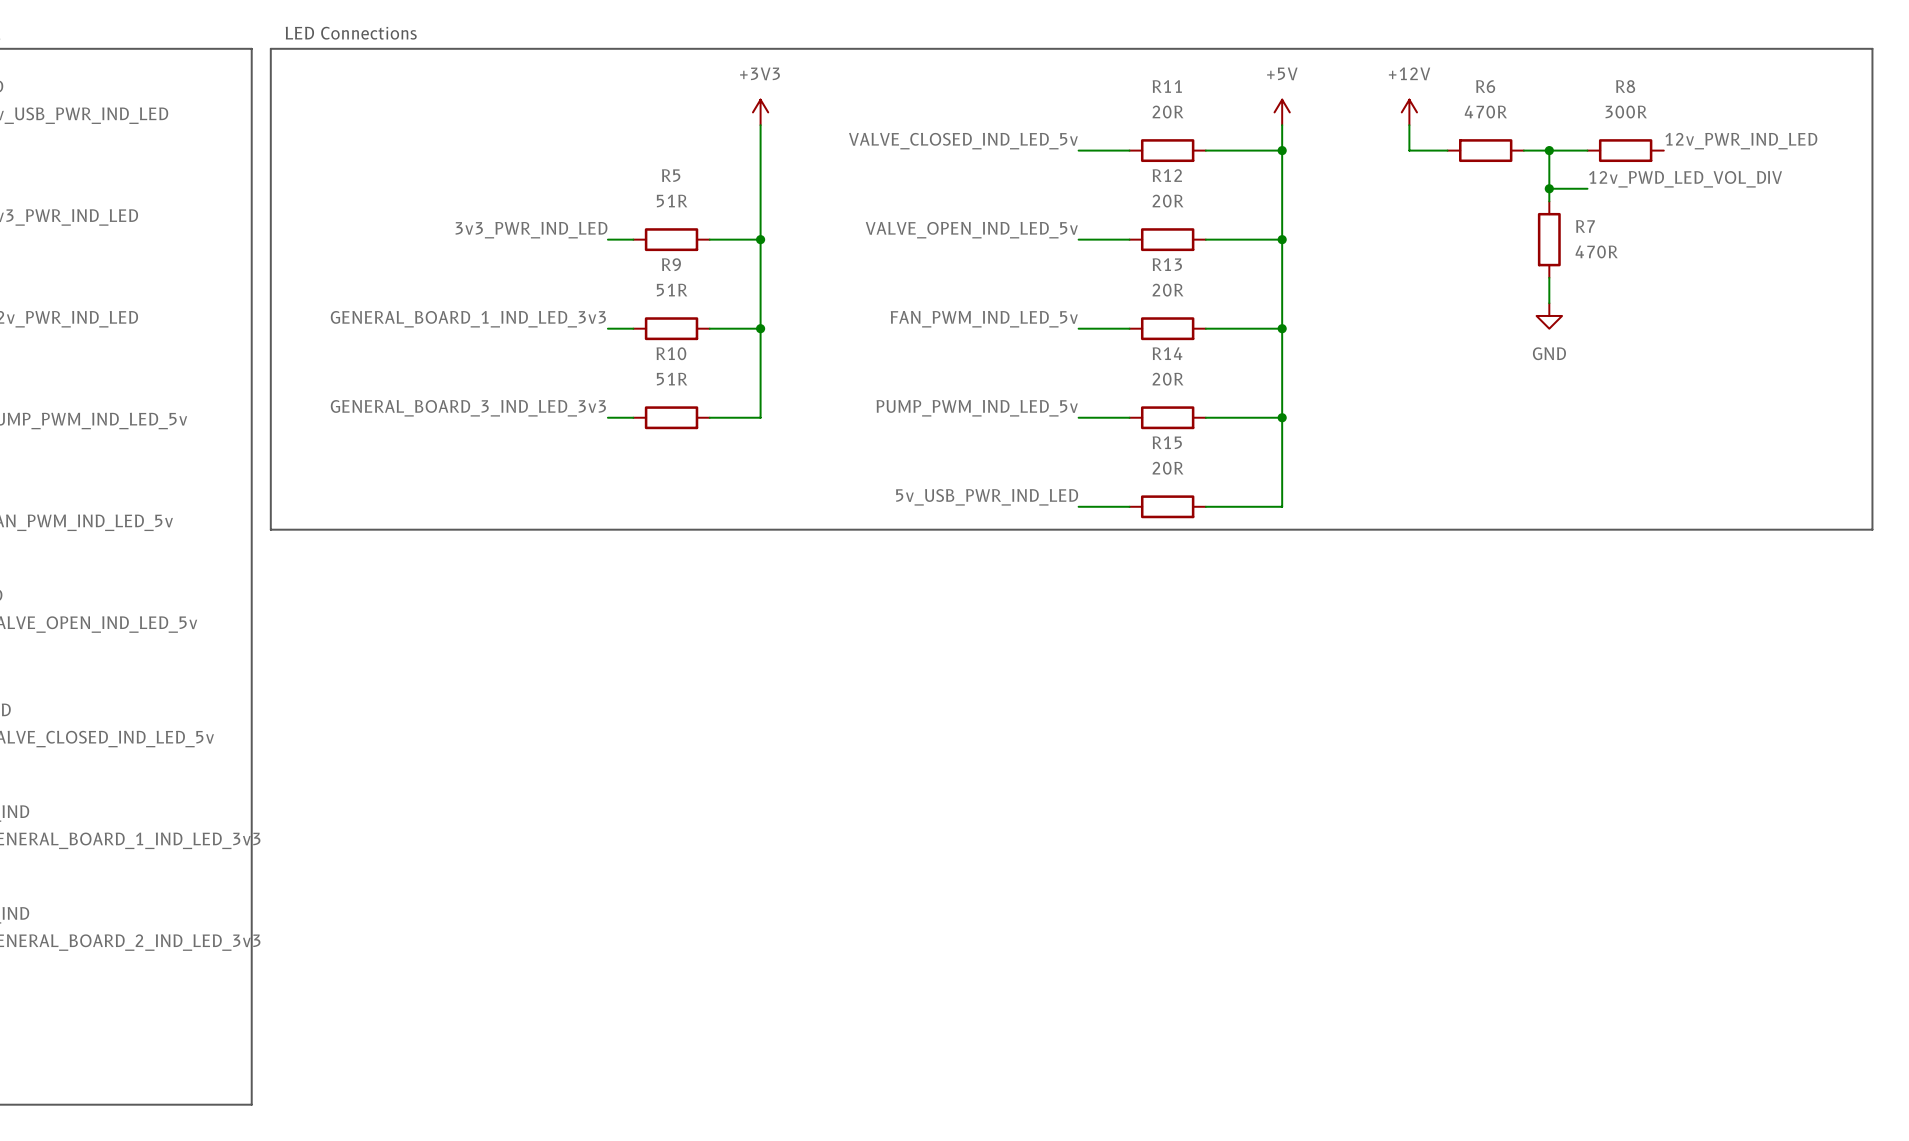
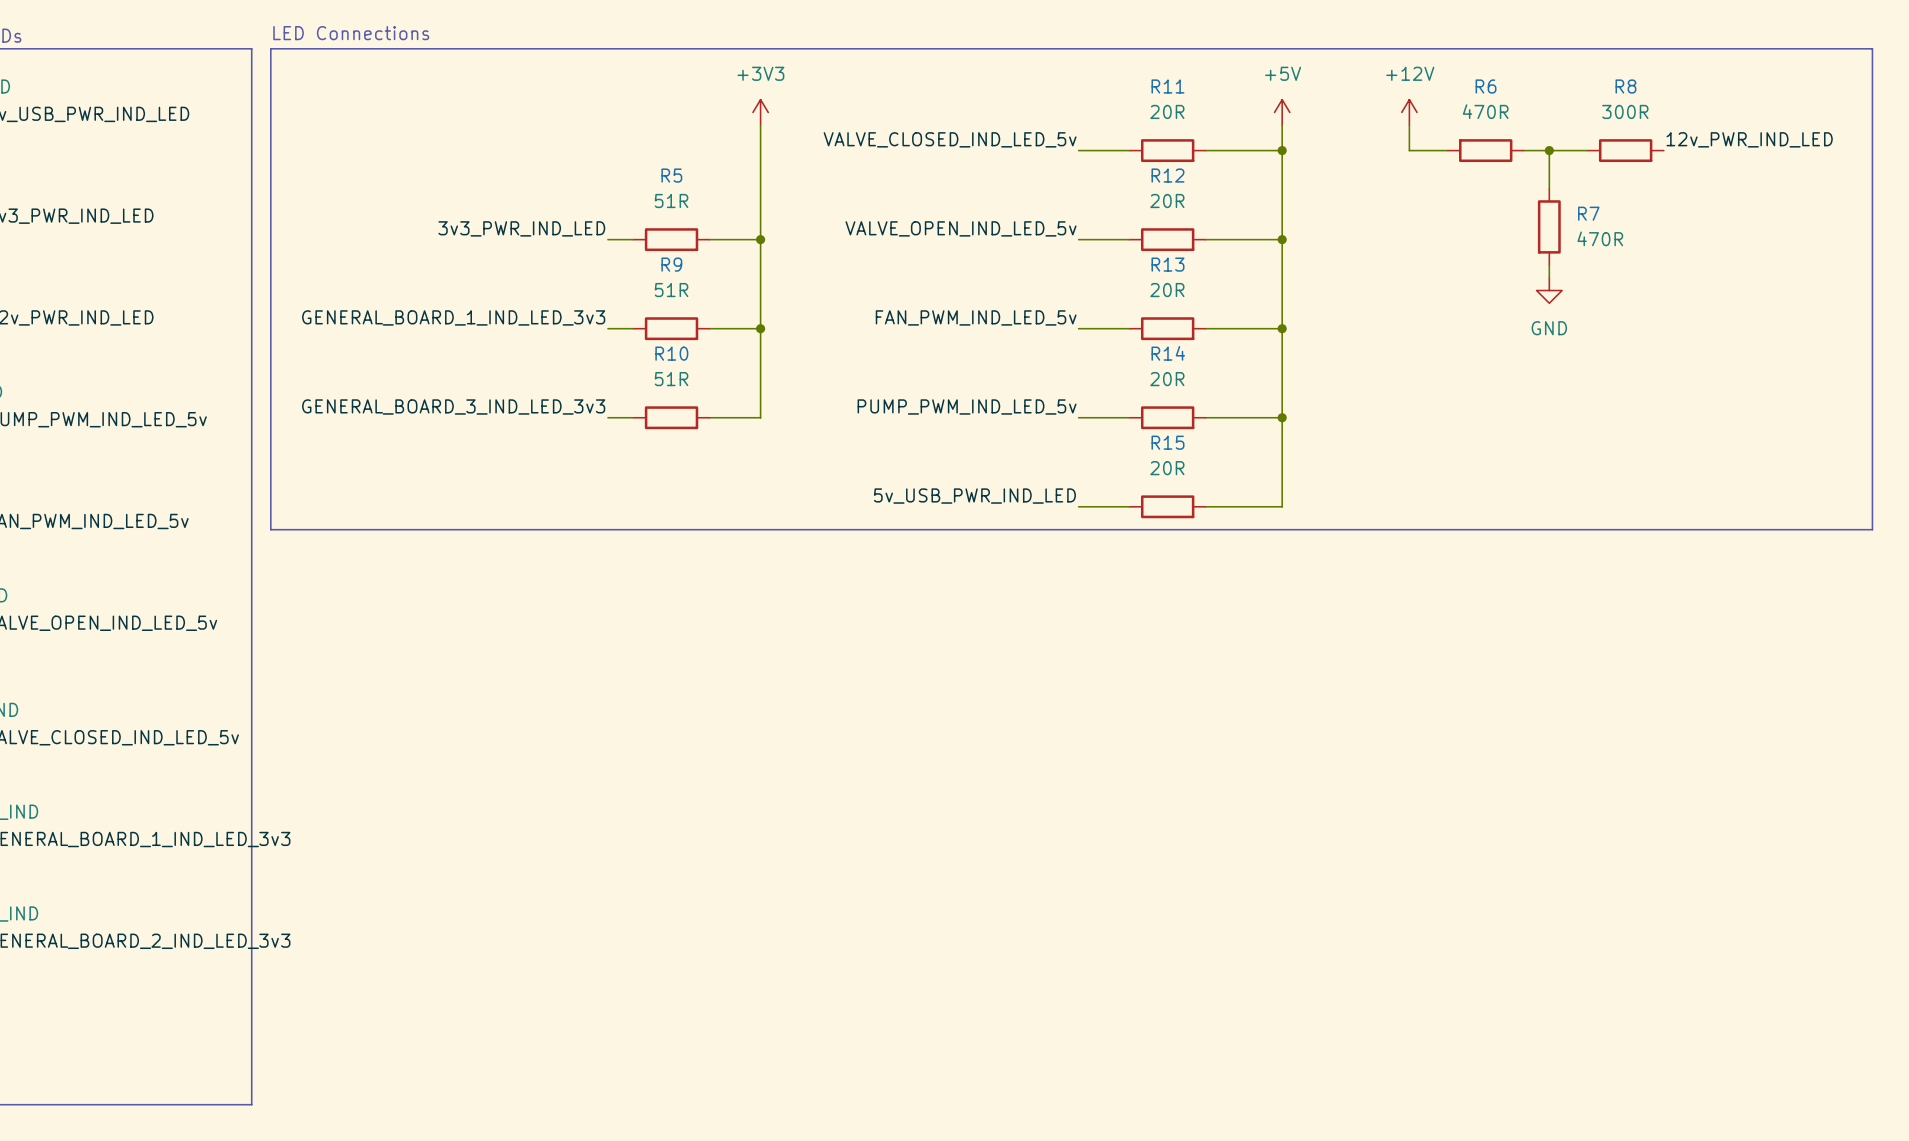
label: 12v_PWD_LED_VOL_DIV (1685, 179) -> none
junction: (1549, 188) -> none
wire: (1587, 188) (1549, 188) (1549, 201) -> none
R7 position: (1549, 239) -> (1549, 226)
power symbol position: GND (1549, 315) -> GND (1549, 290)

